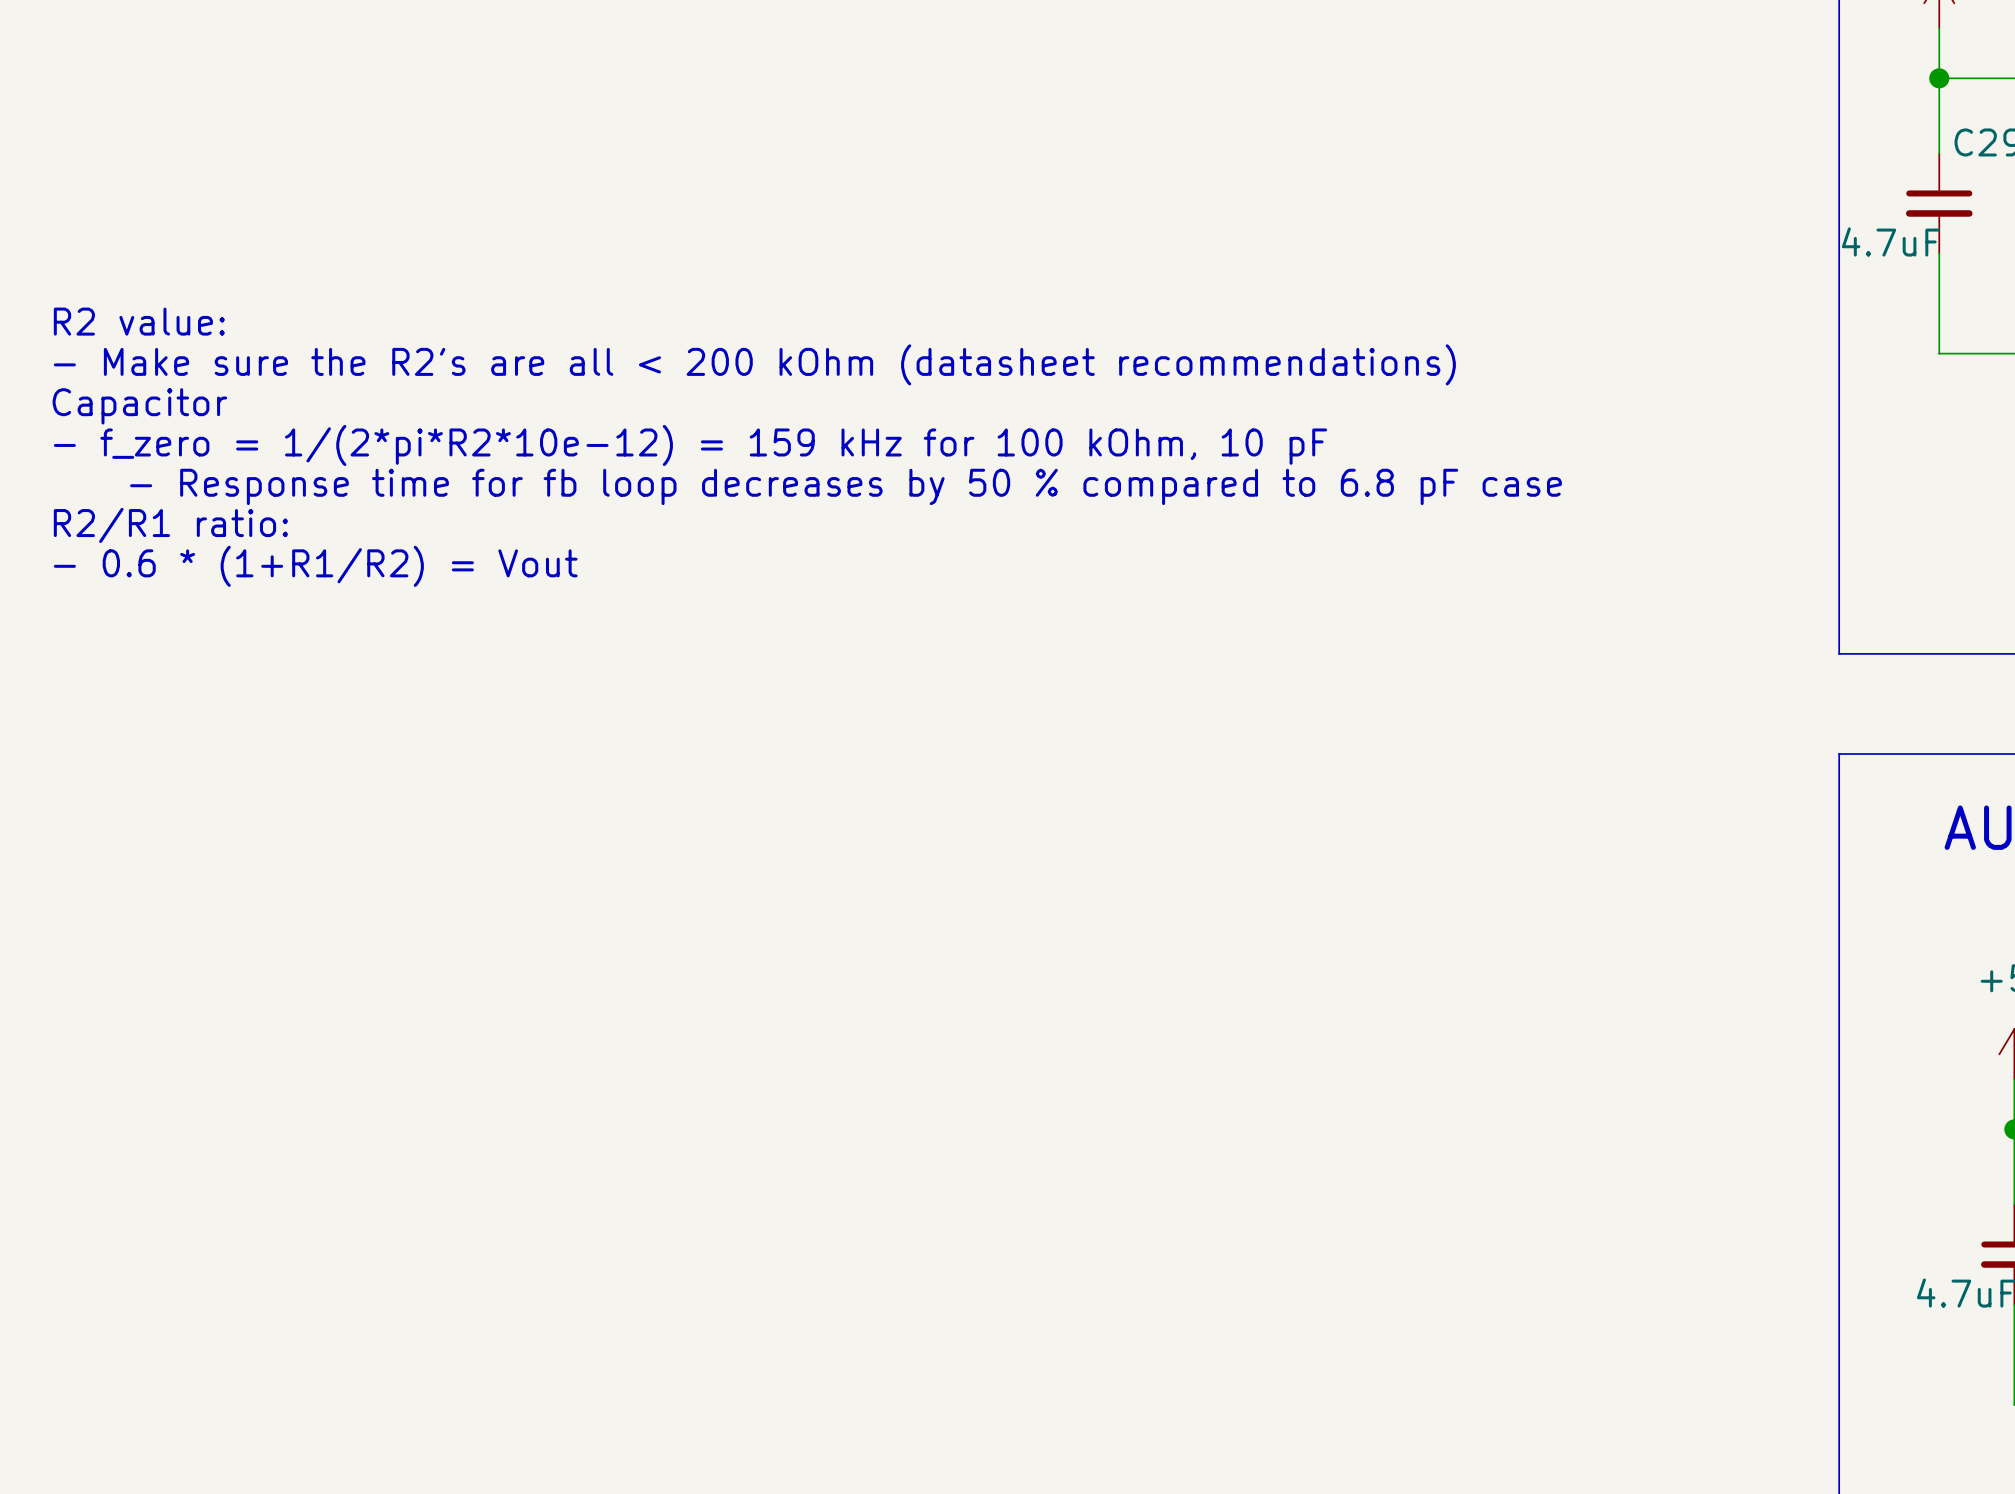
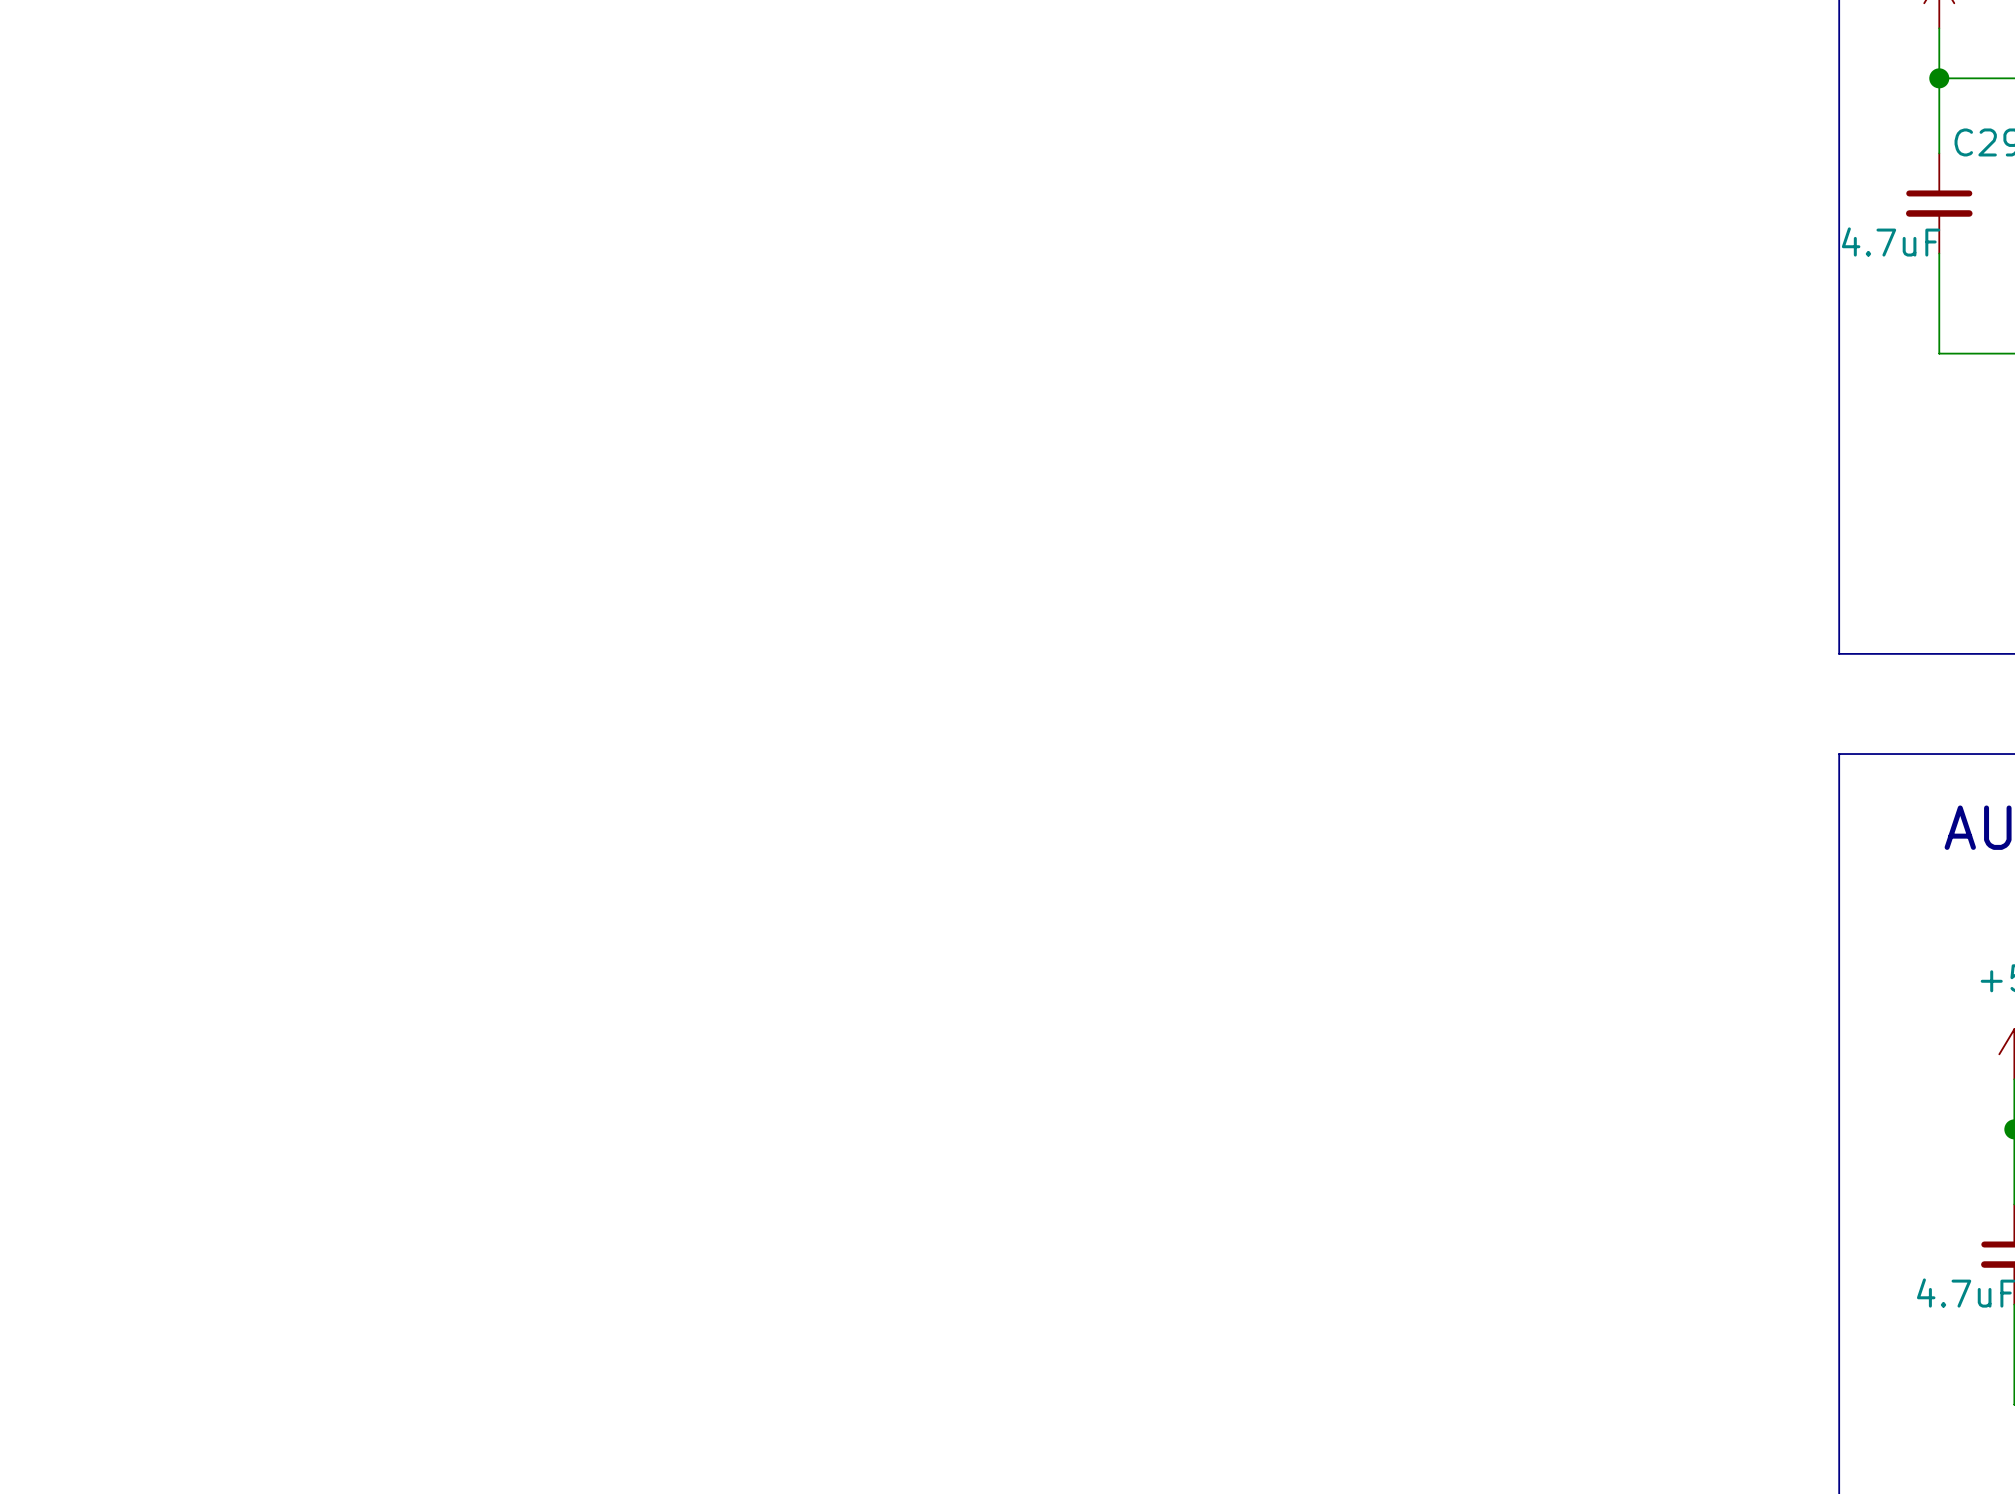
text: R2 value: (139, 321) -> none
text: - Make sure the R2's are all < 200 kOhm (datasheet recommendations) (754, 364) -> none
text: Capacitor (139, 406) -> none
text: - f_zero = 1/(2*pi*R2*10e-12) = 159 kHz for 100 kOhm, 10 pF (690, 445) -> none
text: - Response time for fb loop decreases by 50 % compared to 6.8 pF case (845, 486) -> none
text: R2/R1 ratio: (170, 525) -> none
text: - 0.6 * (1+R1/R2) = Vout (315, 566) -> none

